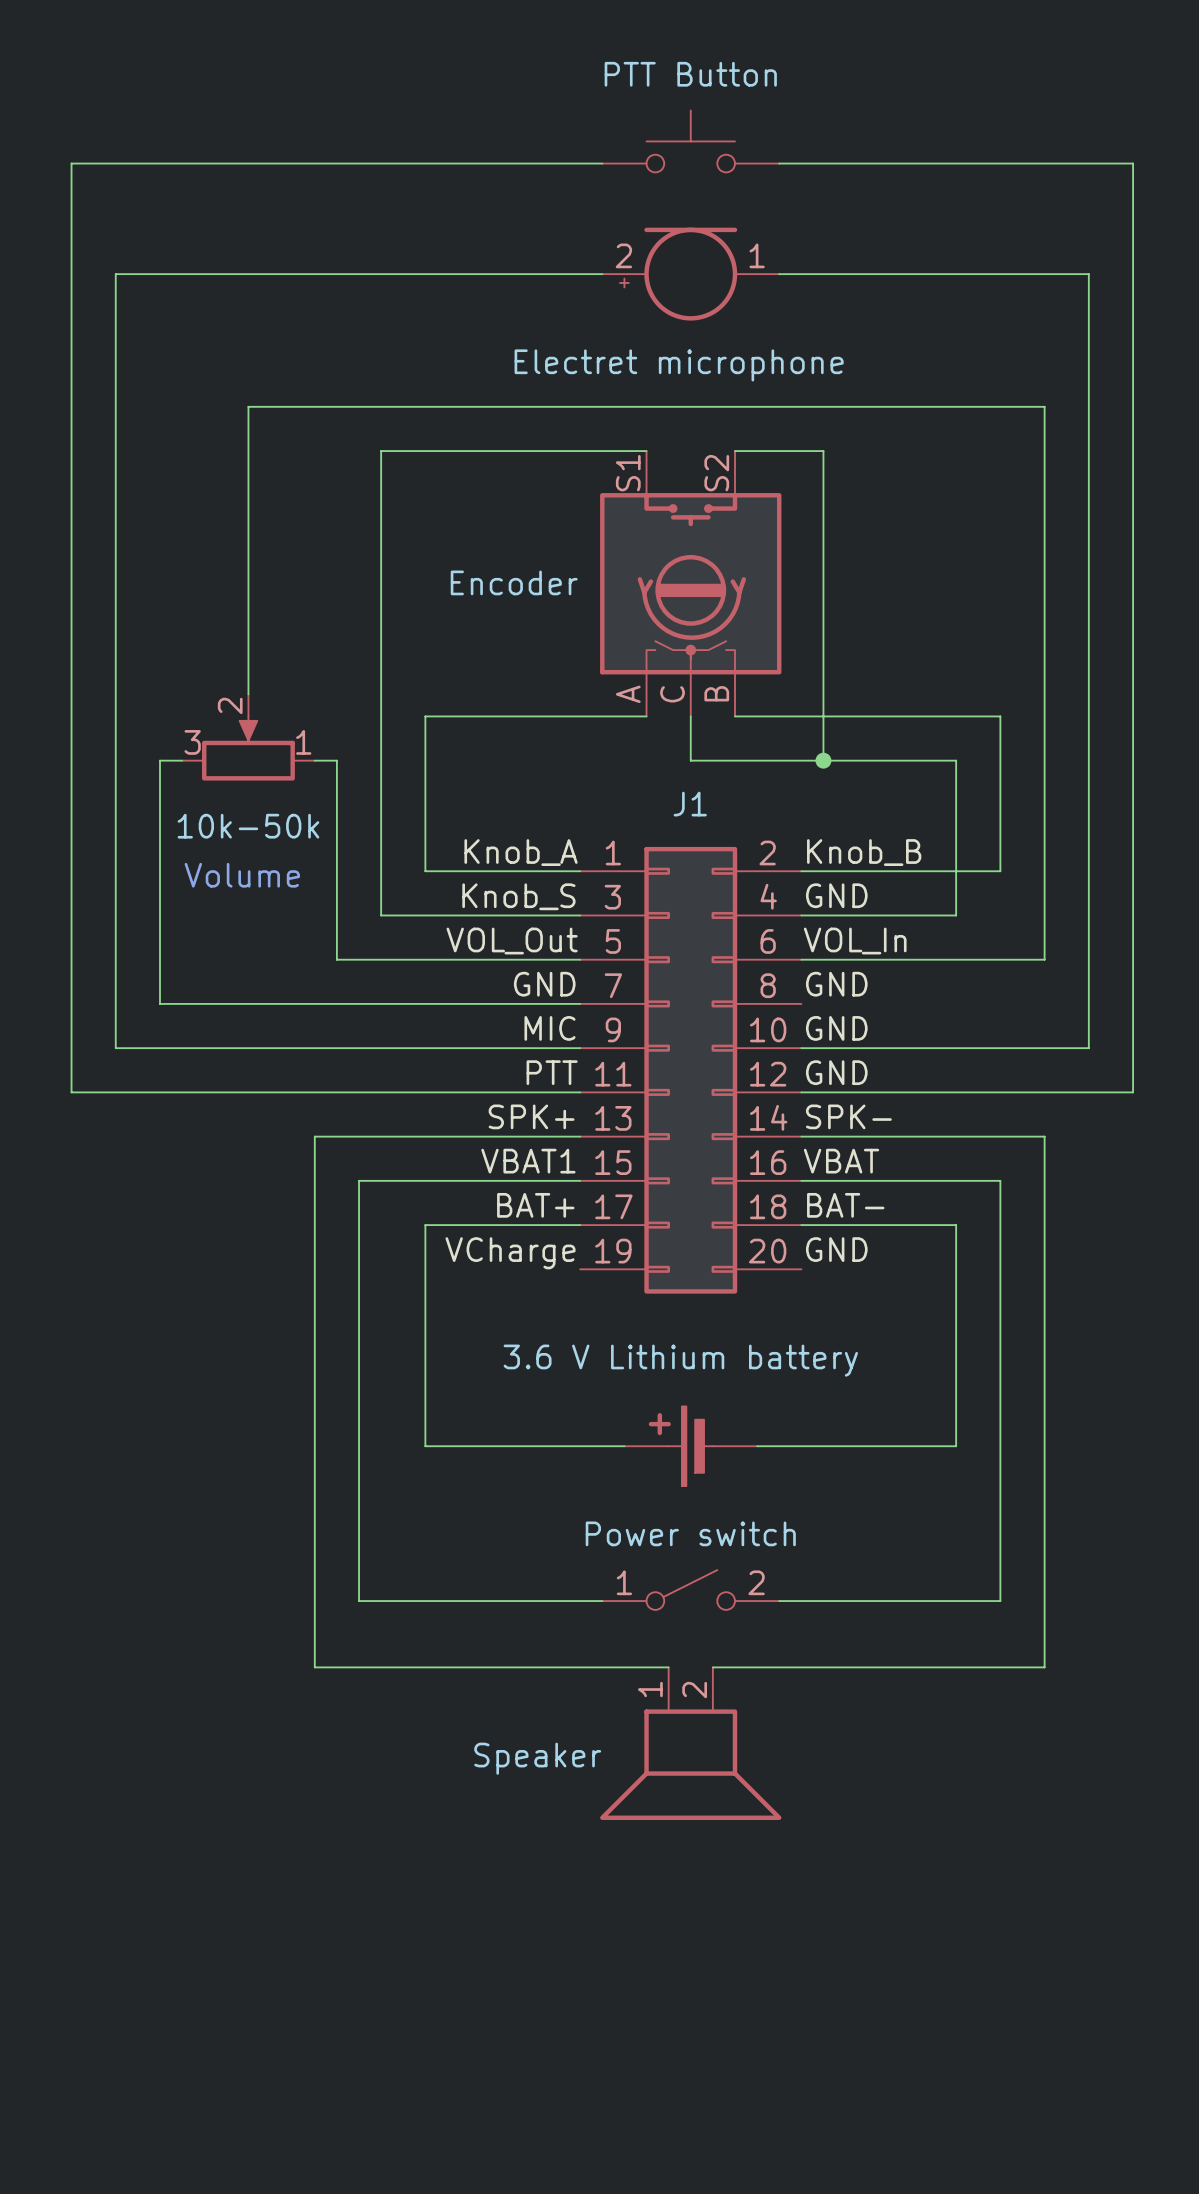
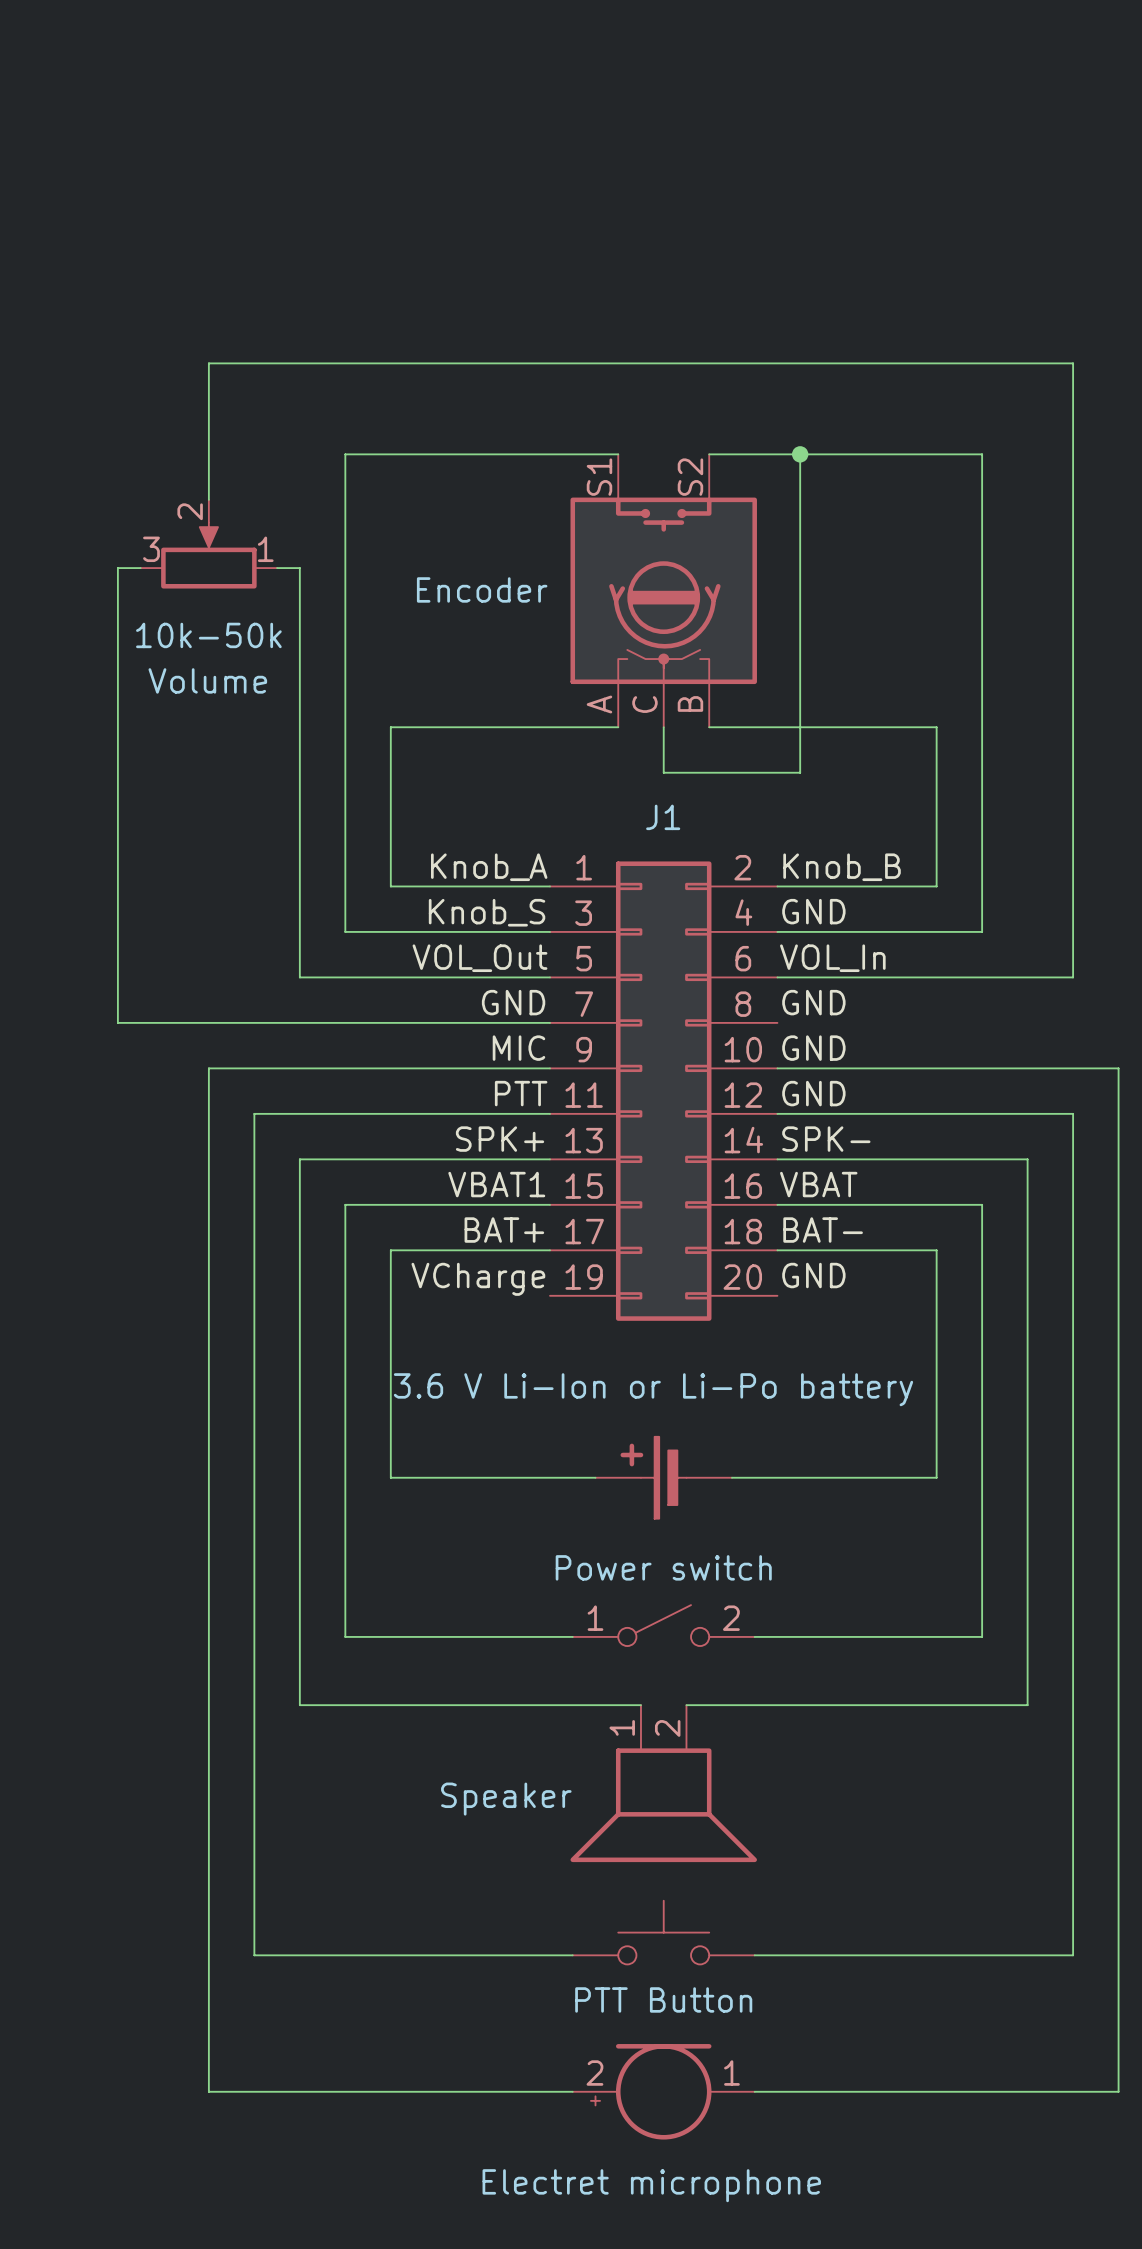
part: PTT Button (690, 141) -> none
wire: (602, 163) (71, 163) (71, 1092) (292, 1092) -> (572, 1955) (254, 1955) (254, 1113)
wire: (779, 163) (1133, 163) (1133, 1048) -> (1073, 1068) (1118, 1068)
wire: (602, 274) (115, 274) (115, 1048) (248, 1048) -> (572, 2091) (208, 2091) (208, 1068)
part: Electret microphone (690, 274) -> none
wire: (779, 274) (1088, 274) (1088, 362) -> (208, 408) (208, 363) (1073, 363)
wire: (248, 406) (1044, 406) (1044, 959) -> none
wire: none -> (800, 454) (982, 454) (982, 727)
junction: none -> (800, 454)
wire: (248, 495) (248, 694) -> none
part: none -> 10k-50k (208, 544)
wire: (956, 716) (1000, 716) -> (936, 727) (936, 772)
part: 10k-50k (248, 737) -> none
wire: (159, 760) (182, 760) -> (117, 772) (117, 568) (140, 568)
wire: (314, 760) (336, 760) -> (277, 568) (299, 568) (299, 772)
wire: (823, 760) (956, 760) -> none
junction: (823, 760) -> none
wire: (1000, 871) (956, 871) (956, 915) -> (982, 886) (982, 931) (936, 931)
text: Volume (242, 875) -> none
wire: (1088, 959) (1088, 1048) -> (1073, 977) (1027, 977)
wire: (1088, 1092) (1133, 1092) -> (1073, 1113) (1073, 1955) (754, 1955)
wire: none -> (1118, 1113) (1118, 2091) (754, 2091)
wire: (336, 1136) (314, 1136) (314, 1667) (336, 1667) -> (299, 1159) (299, 1705)
wire: (381, 1180) (359, 1180) (359, 1601) (381, 1601) -> (345, 1204) (345, 1636)
part value: 3.6 V Lithium battery (680, 1360) -> 3.6 V Li-Ion or Li-Po battery (653, 1389)
part: none -> PTT Button (663, 1932)
part: none -> Electret microphone (663, 2091)

